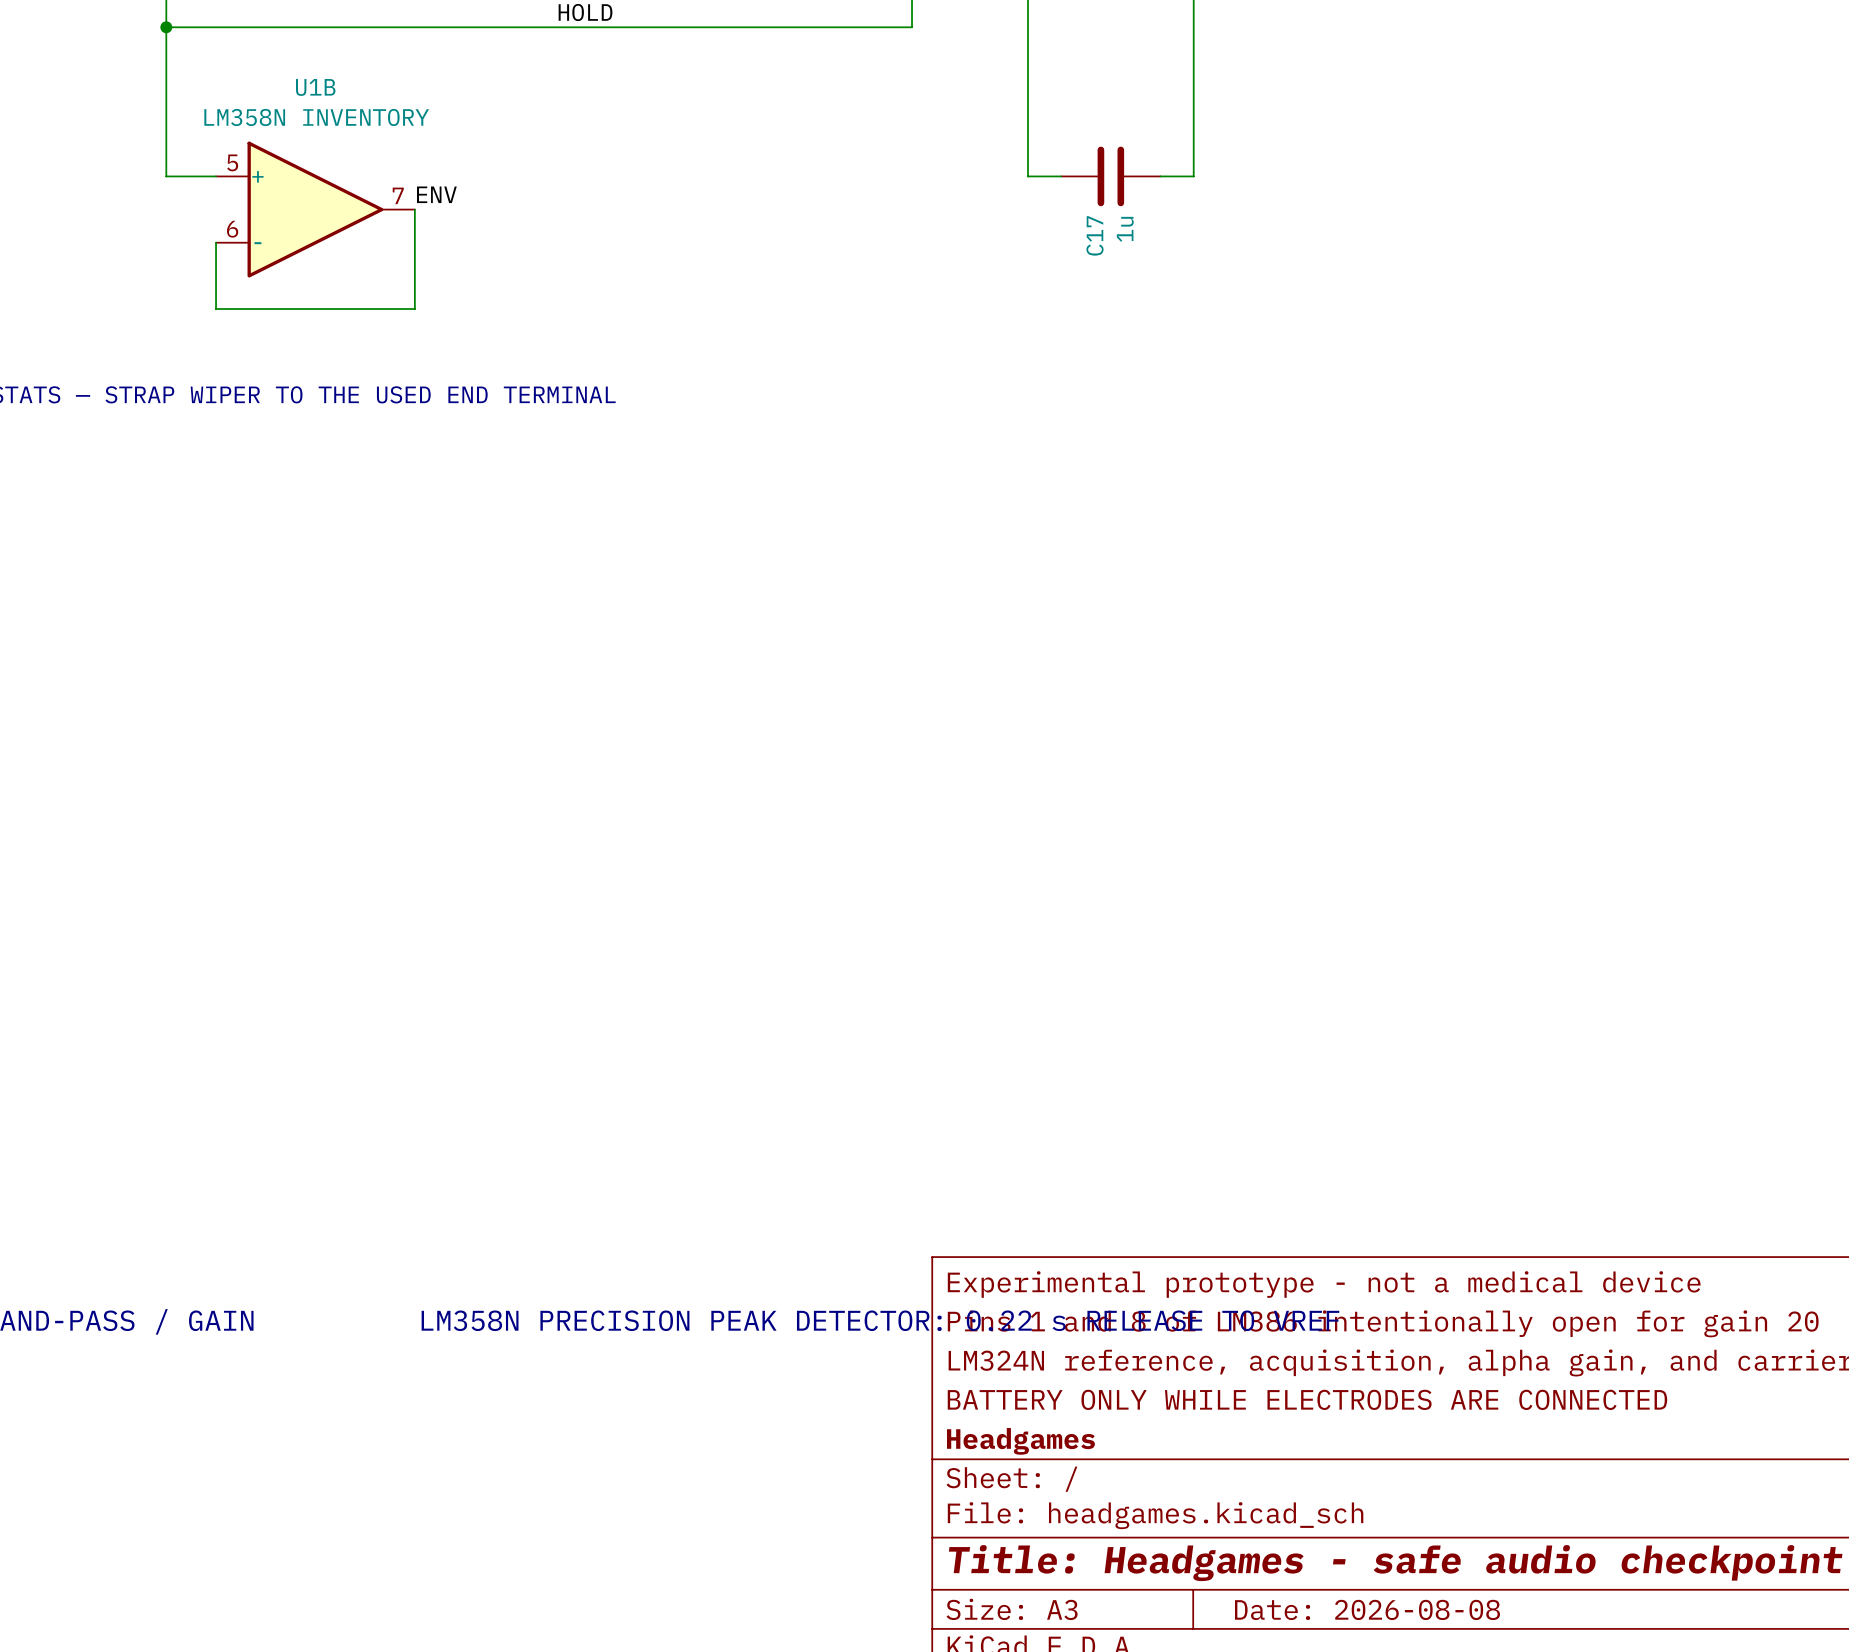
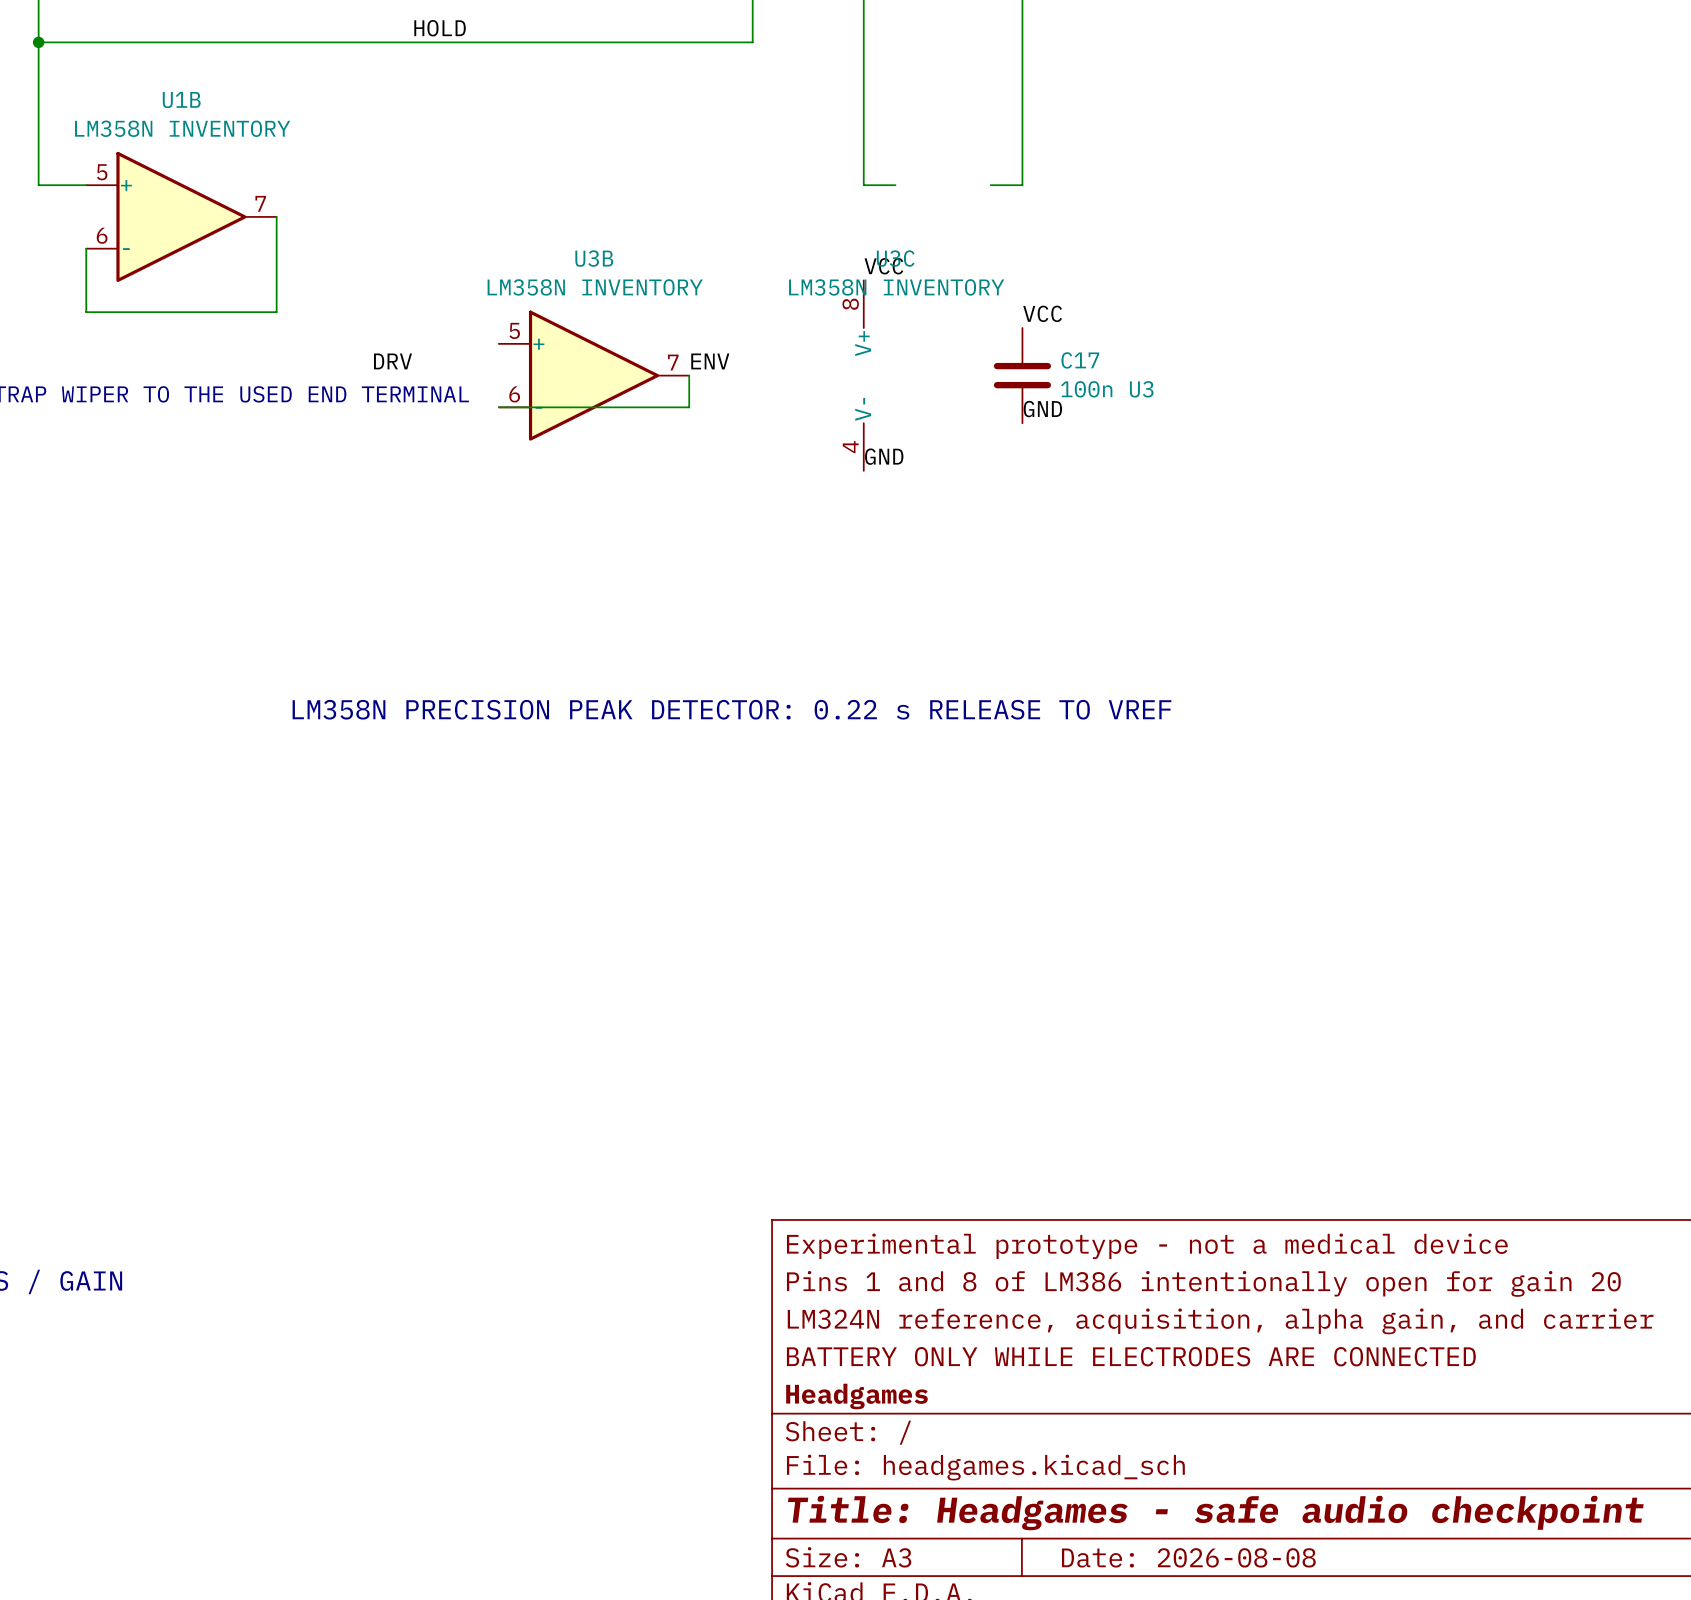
C17 rotation: 0° (1110, 176) -> 90° clockwise (1022, 375)
C17 position: (1110, 176) -> (1022, 375)
label: ENV (436, 194) -> none
C17 value: 1u (1125, 229) -> 100n U3 (1107, 389)
C17 name position: C17 (1094, 235) -> C17 (1080, 360)
label: none -> VCC (883, 266)
label: none -> VCC (1042, 313)
label: none -> DRV (392, 361)
label: none -> ENV (710, 361)
U3B: none -> LM358N INVENTORY (594, 375)
wire: none -> (689, 375) (689, 407) (498, 407)
U3C: none -> LM358N INVENTORY (863, 375)
label: none -> GND (1042, 409)
label: none -> GND (884, 456)
text: none -> LM358N PRECISION PEAK DETECTOR: 0.22 s RELEASE TO VREF (731, 709)
text: LM358N PRECISION PEAK DETECTOR: 0.22 s RELEASE TO VREF (880, 1320) -> none

